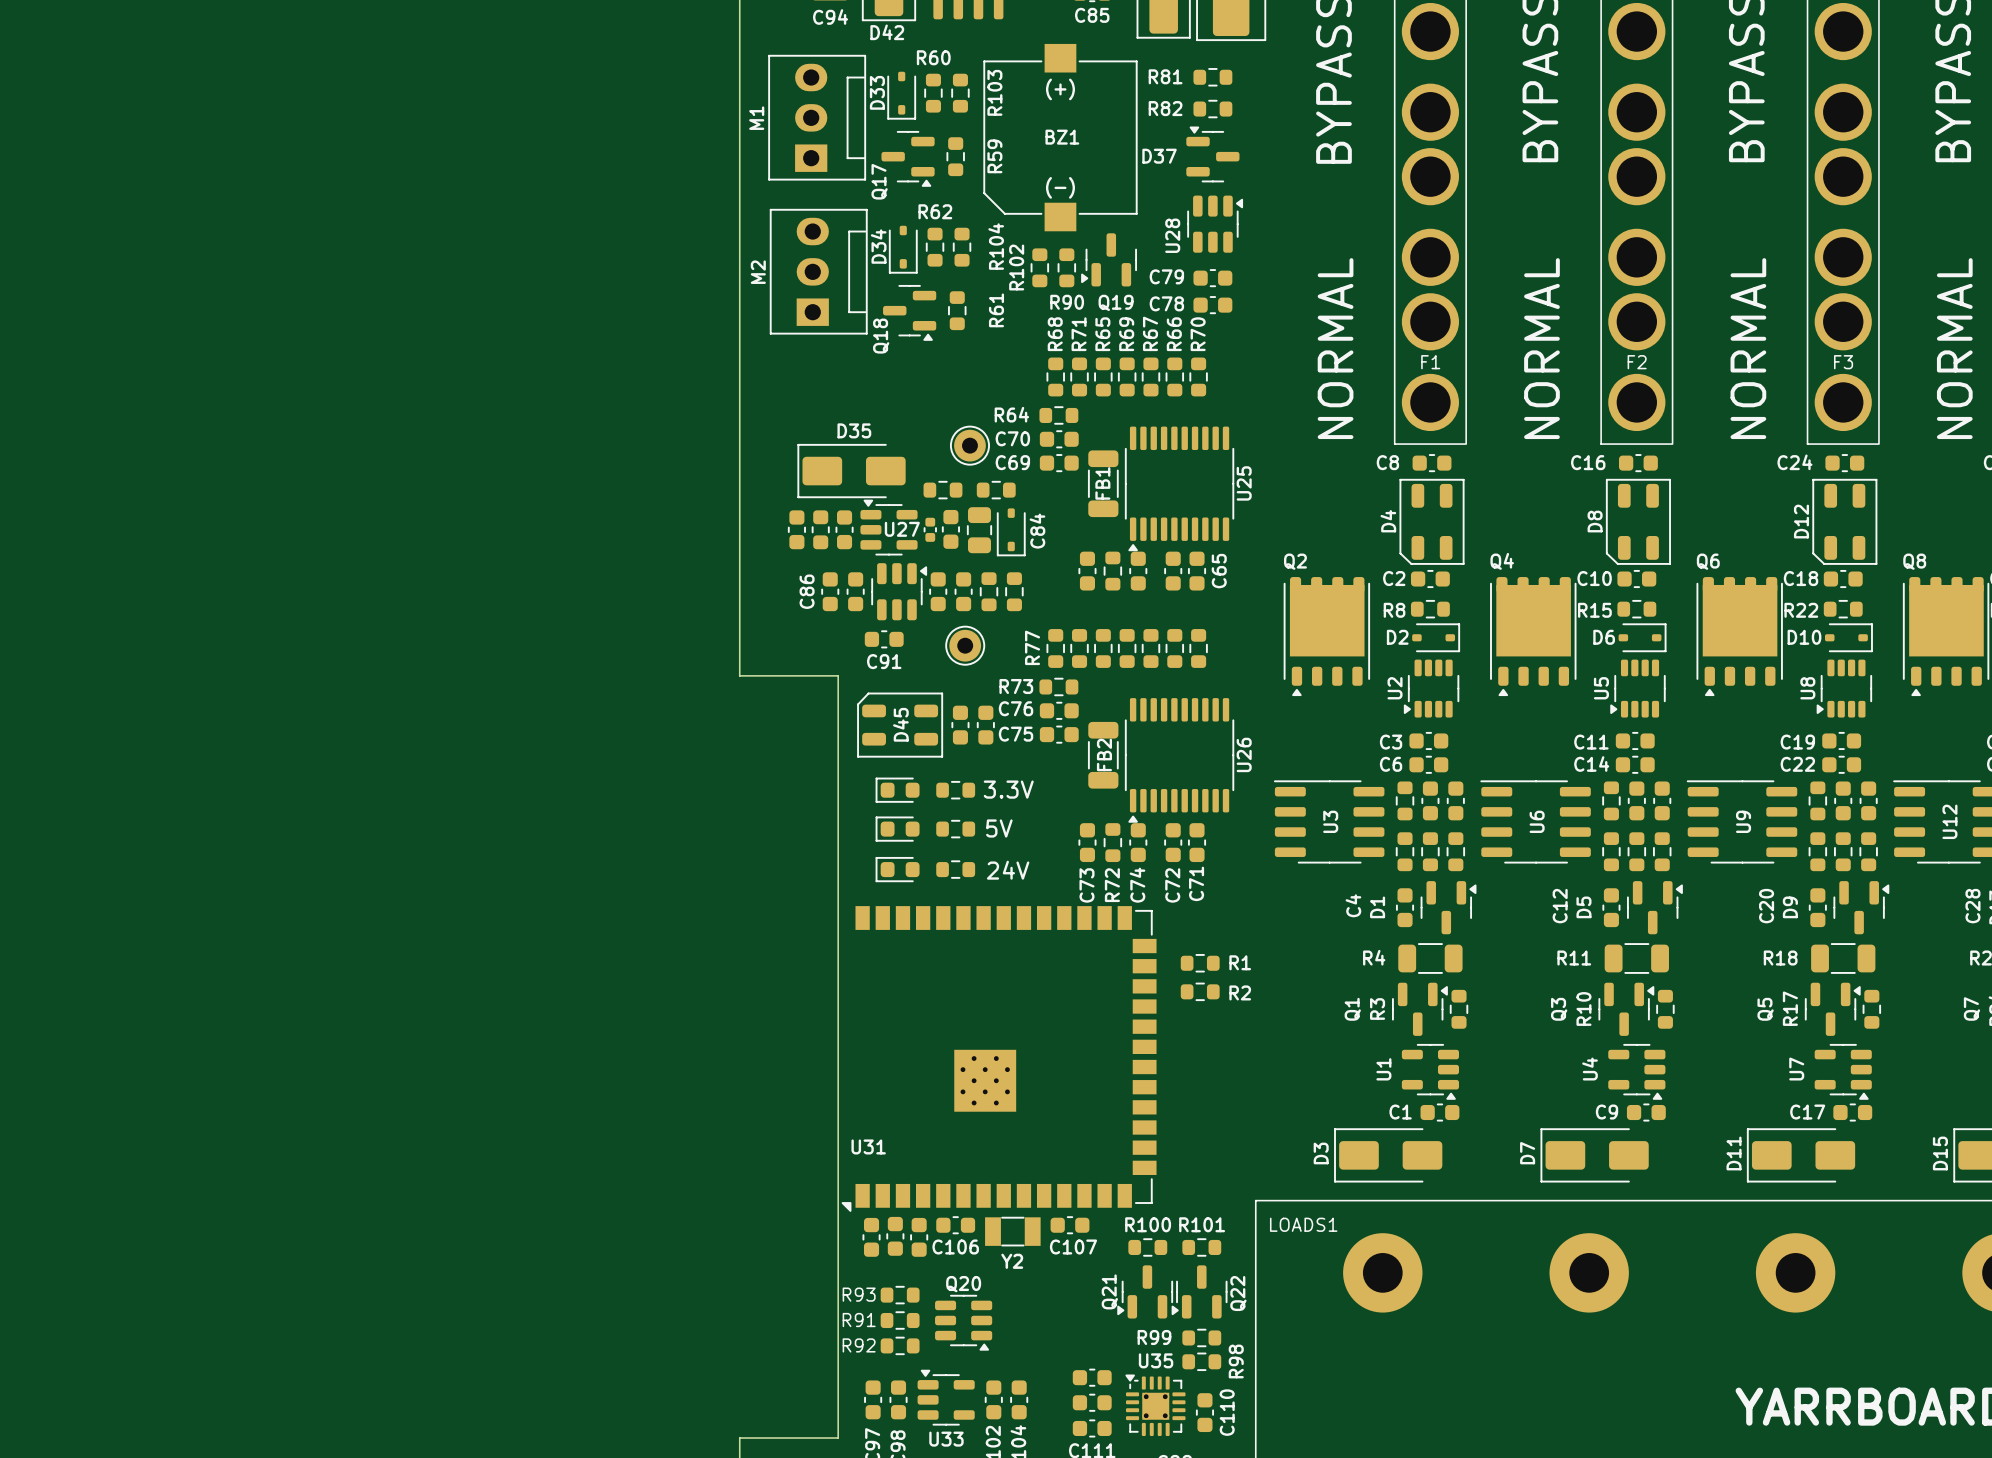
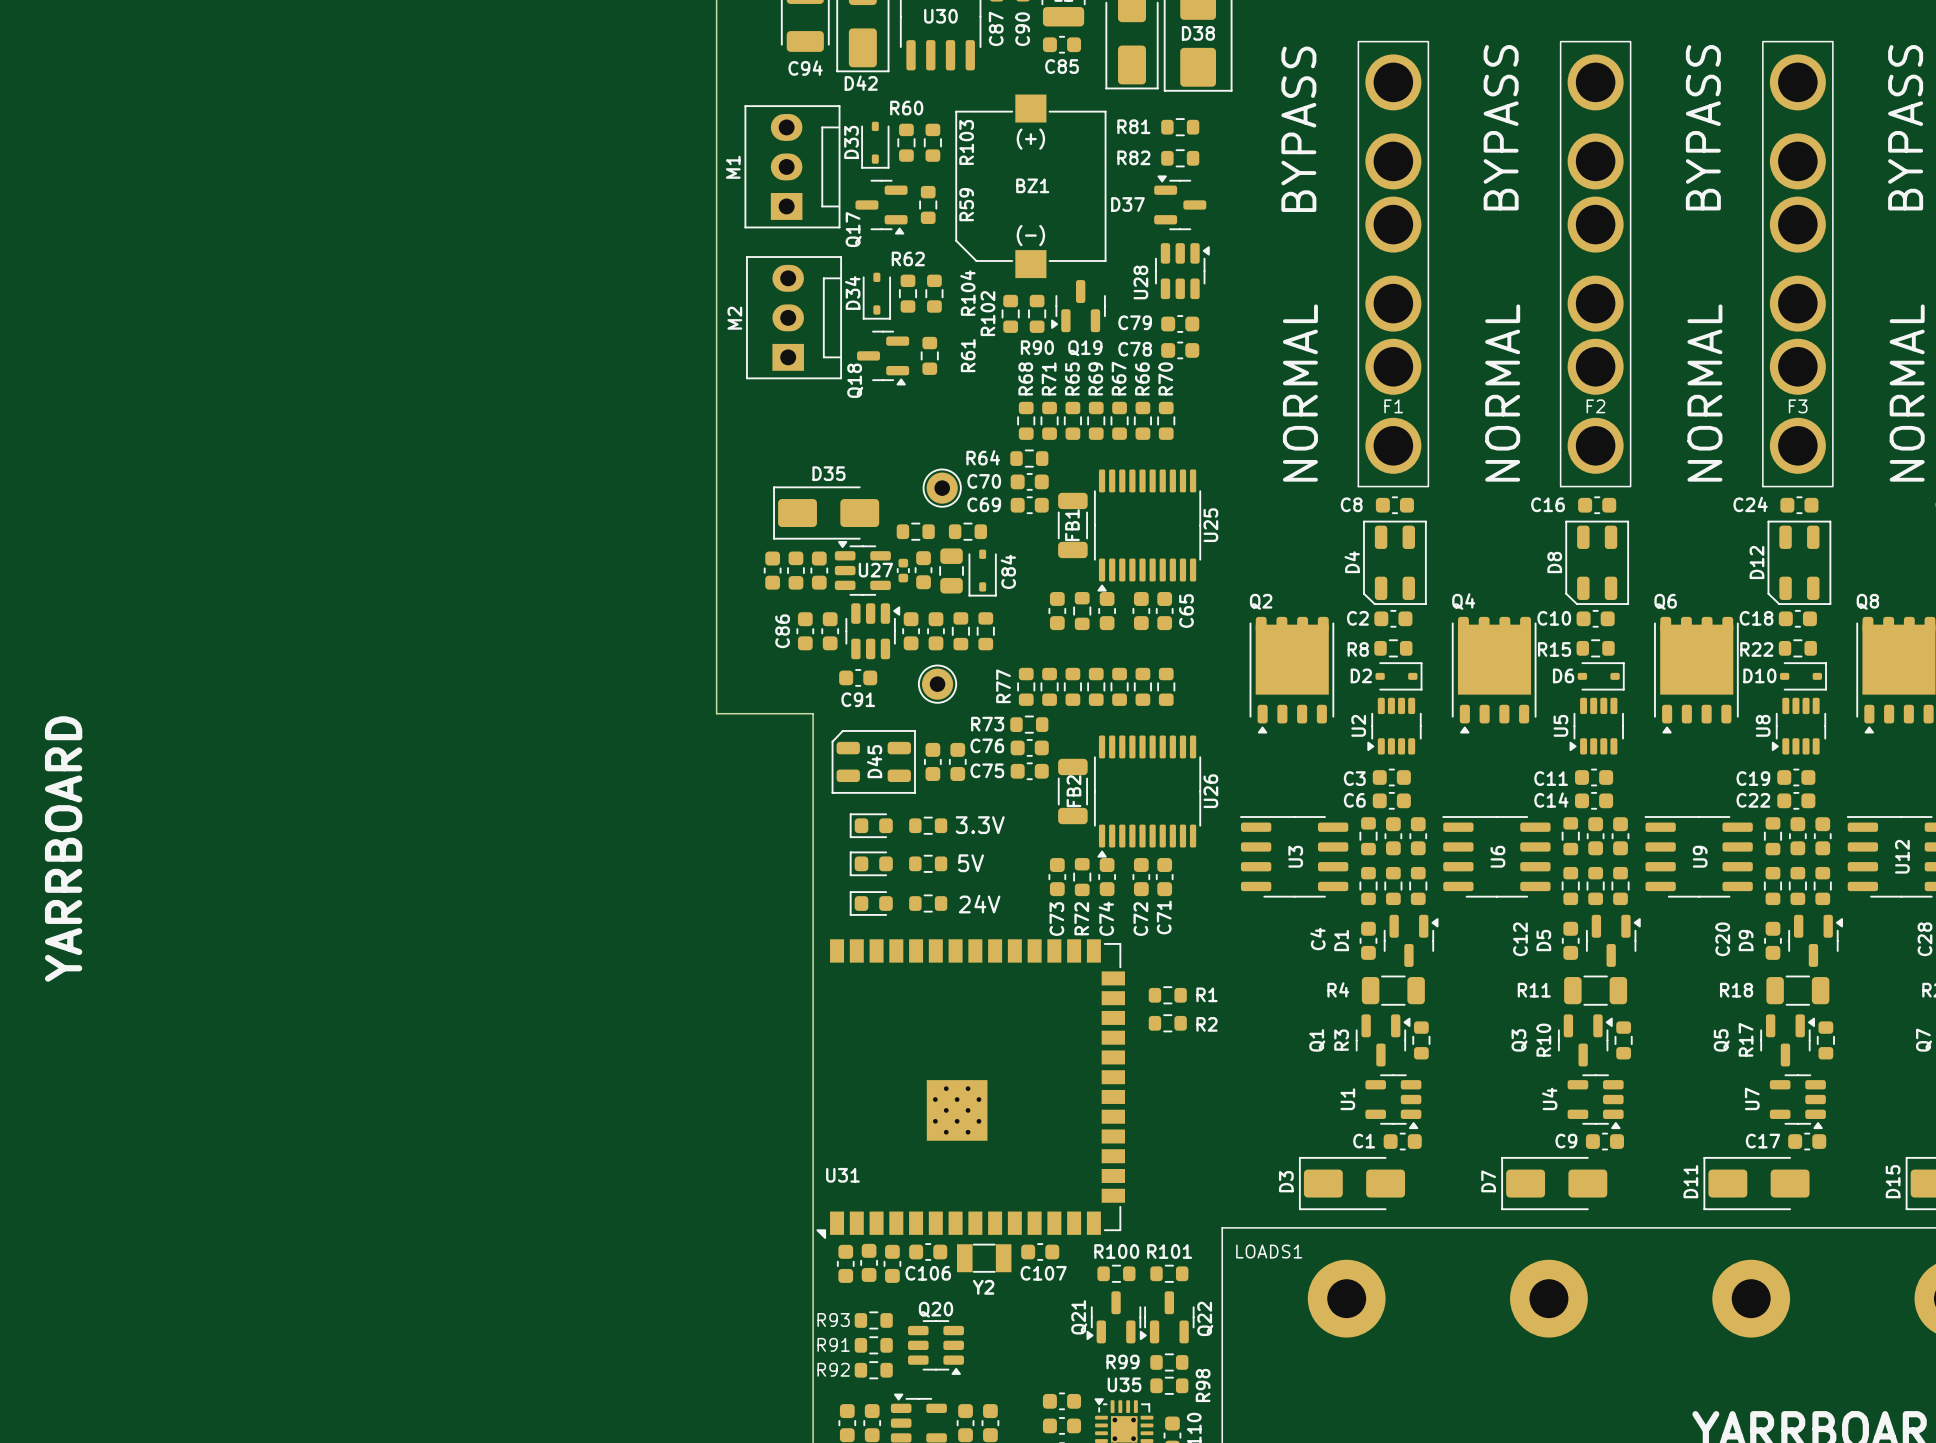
text: none -> YARRBOARD (63, 848)

